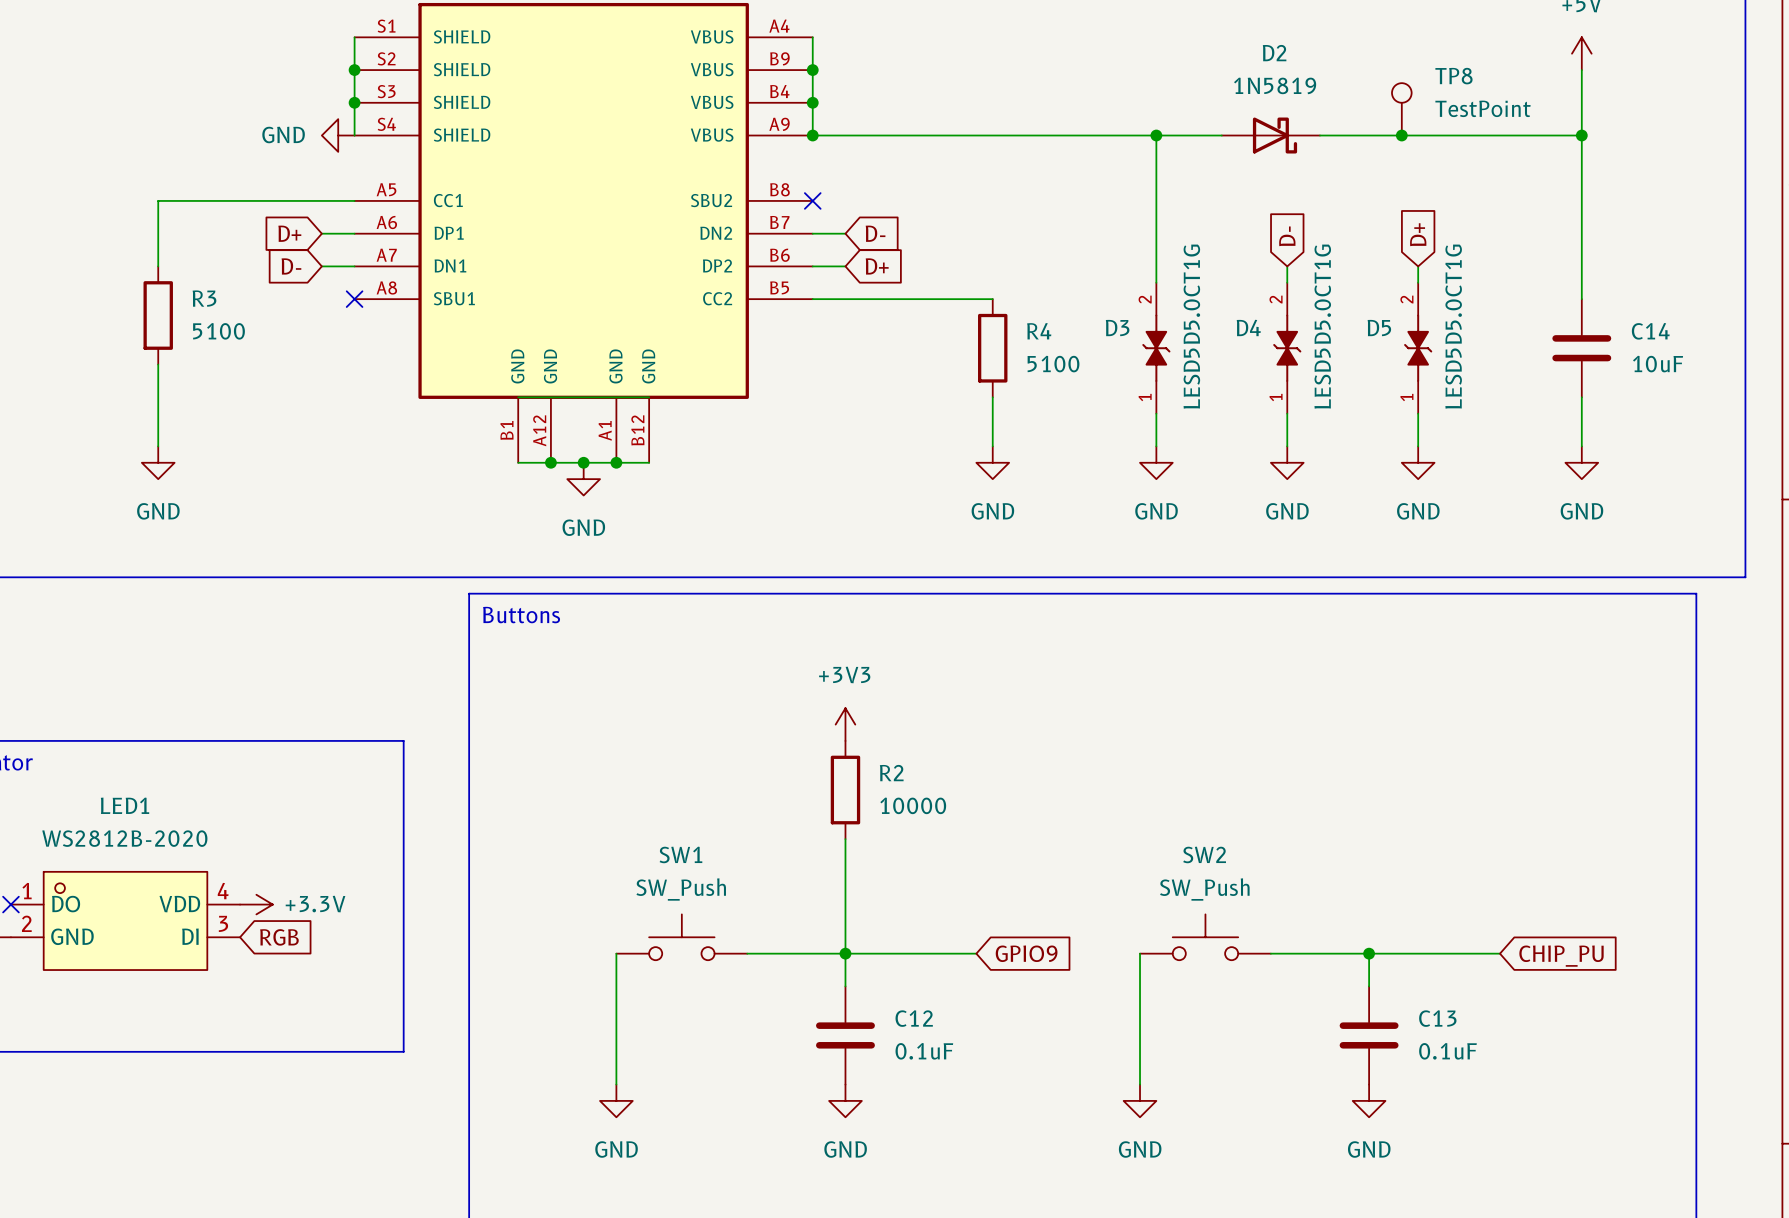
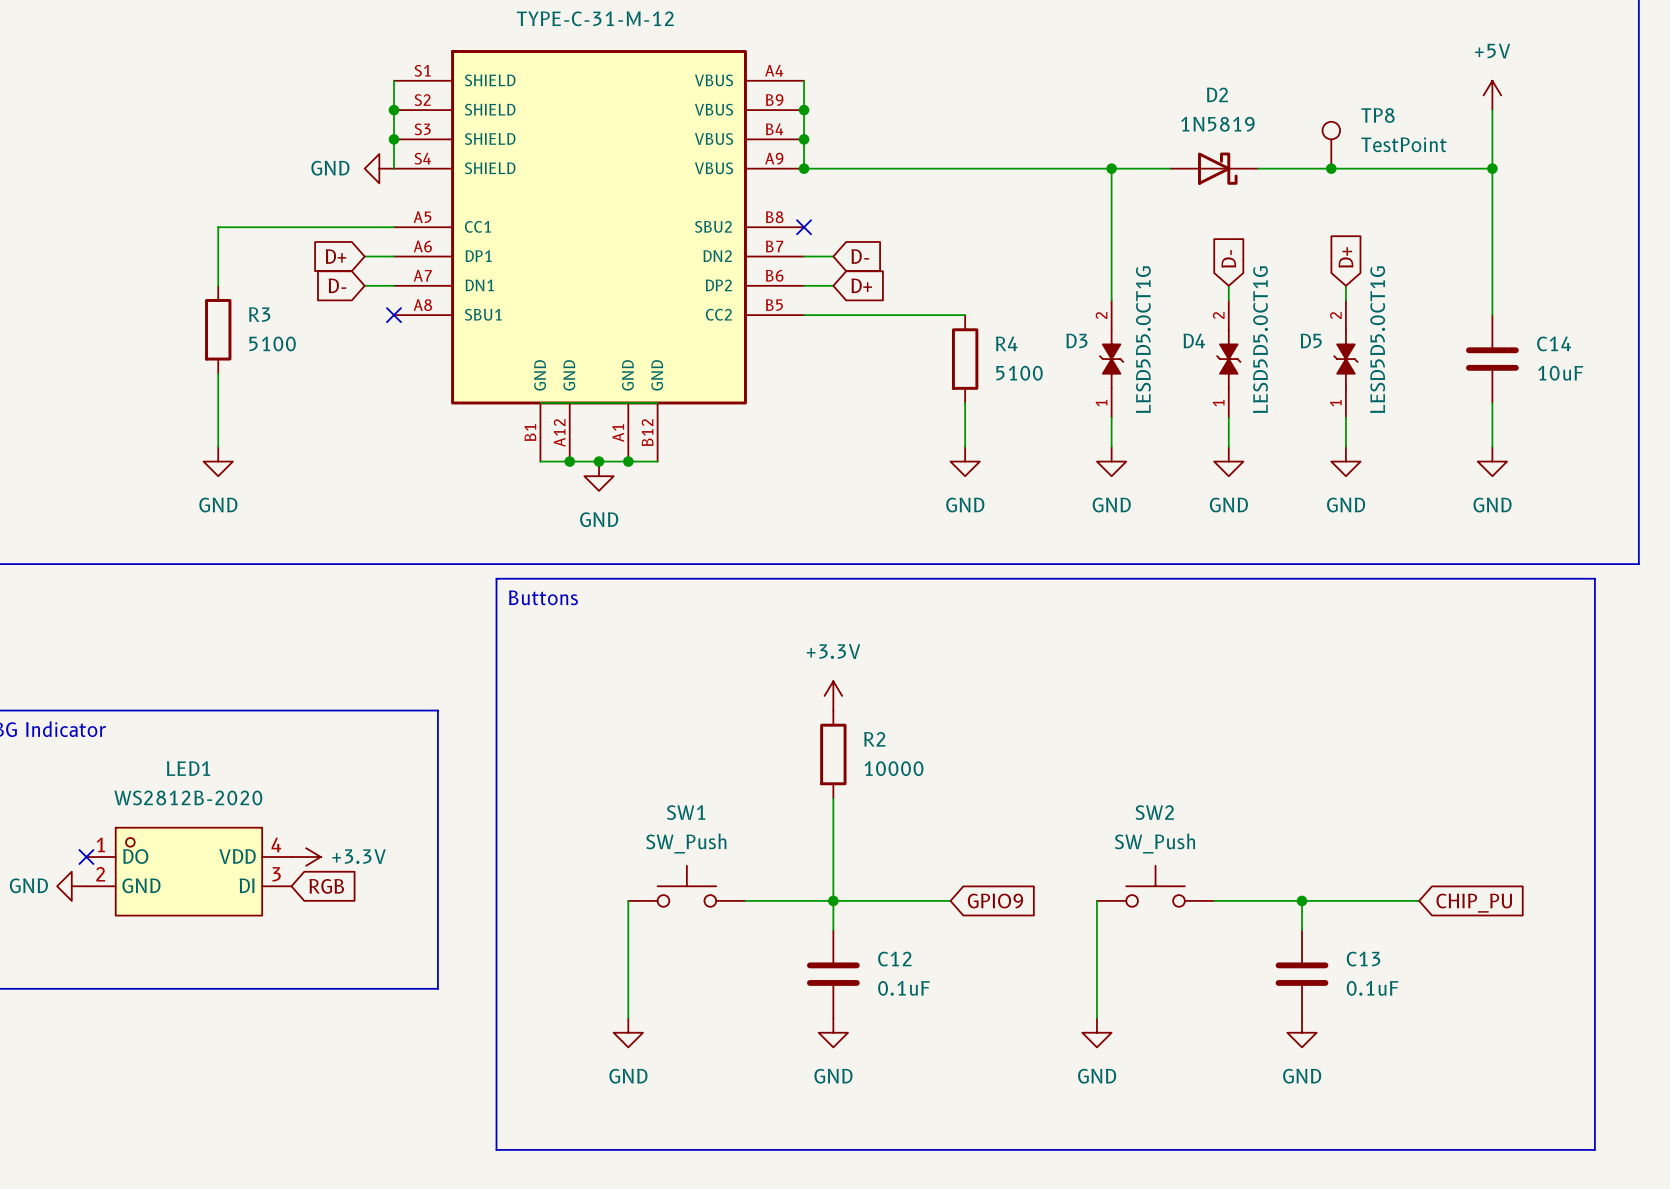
power symbol: +3V3 (845, 724) -> +3.3V (833, 695)

